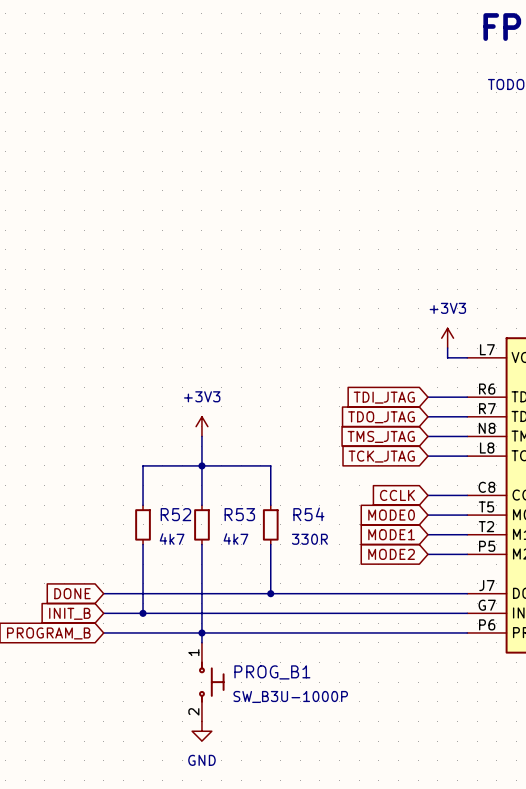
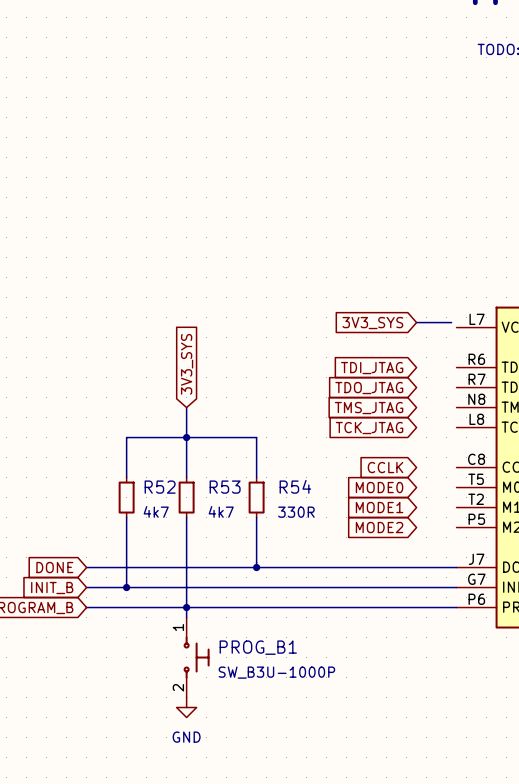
power symbol: +3V3 (447, 338) -> none
wire: (447, 348) (447, 357) (467, 357) -> none
wire: none -> (416, 322) (451, 322)
global label: none -> 3V3_SYS (372, 323)
global label: none -> 3V3_SYS (187, 364)
wire: (427, 397) (467, 397) -> none
wire: (427, 416) (467, 416) -> none
power symbol: +3V3 (201, 426) -> none
wire: (427, 436) (467, 436) -> none
wire: (427, 456) (467, 456) -> none
wire: (427, 495) (467, 495) -> none
wire: (427, 515) (467, 515) -> none
wire: (427, 534) (467, 534) -> none
wire: (427, 554) (467, 554) -> none

